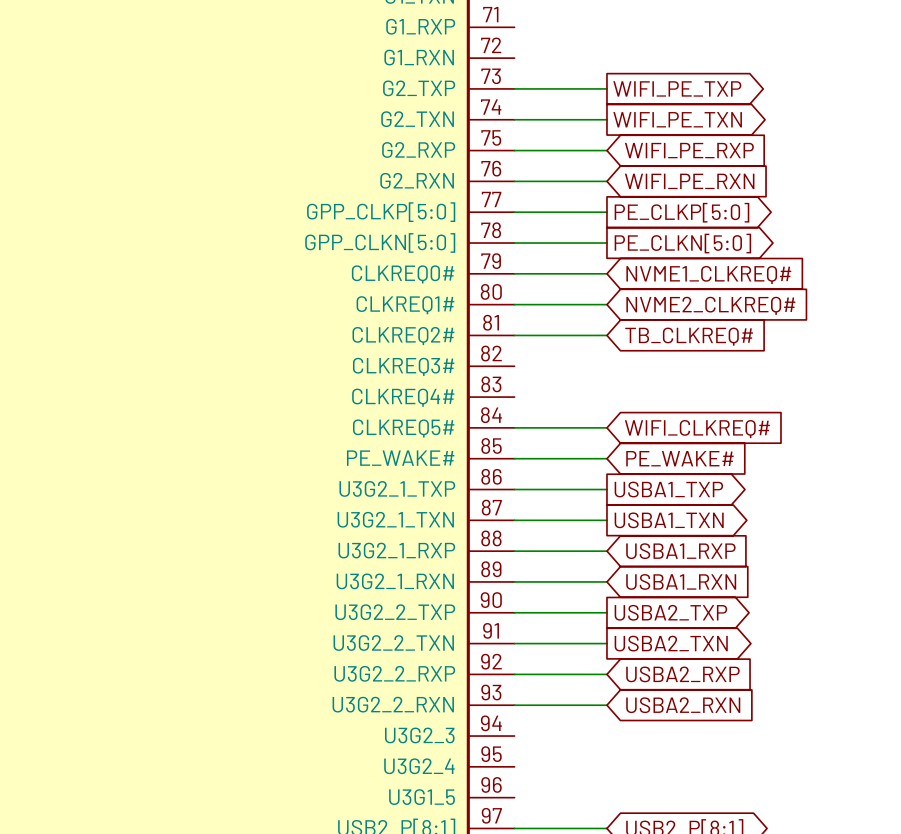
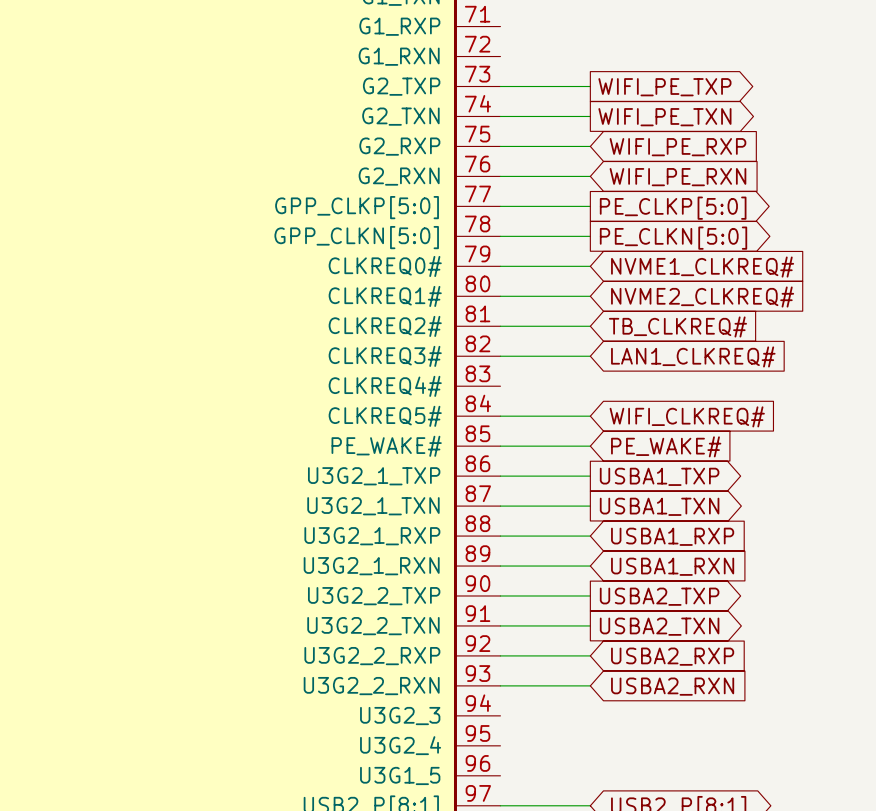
wire: none -> (500, 356) (590, 356)
global label: none -> LAN1_CLKREQ# (693, 356)

